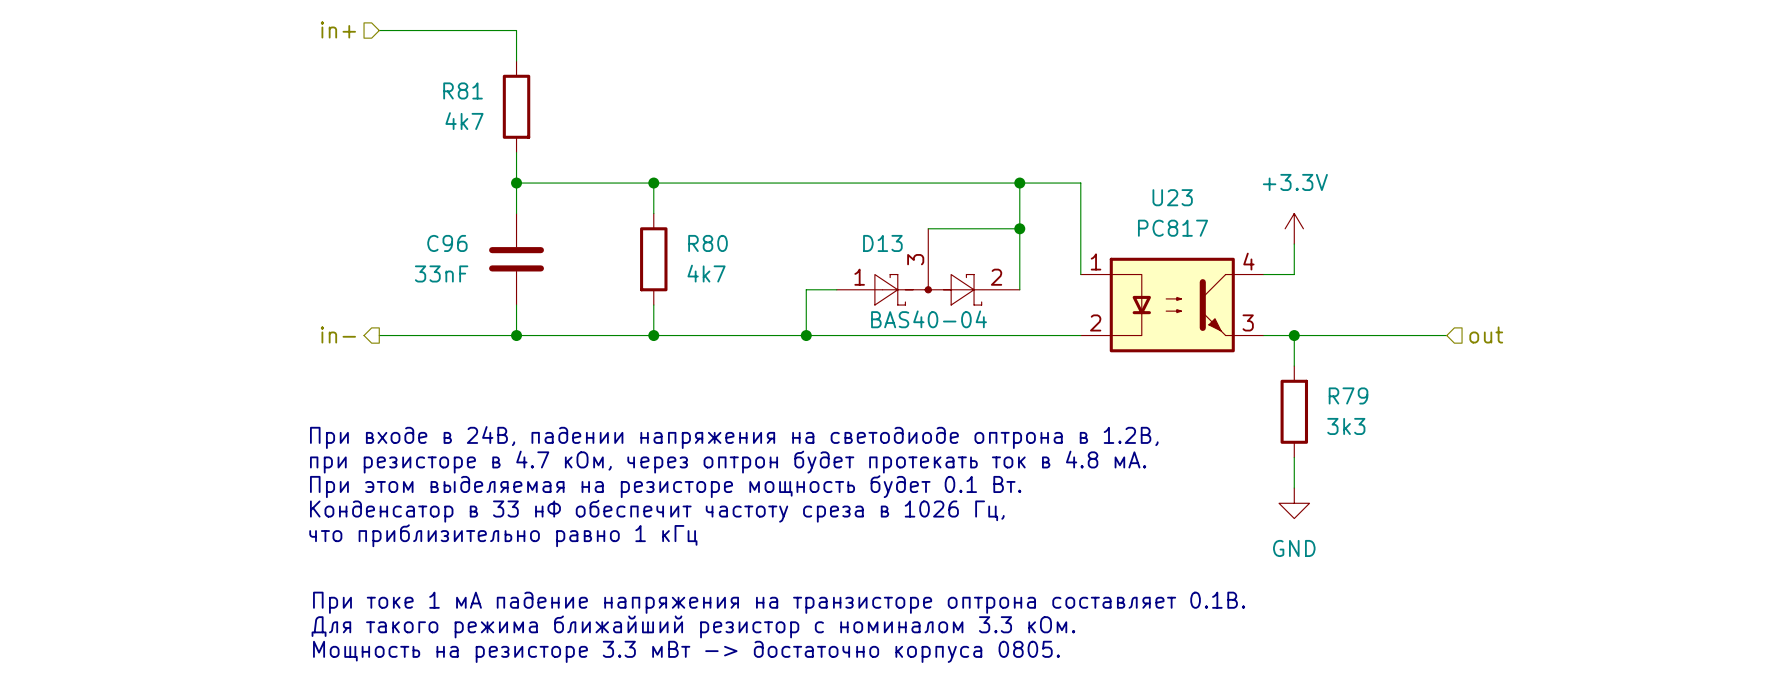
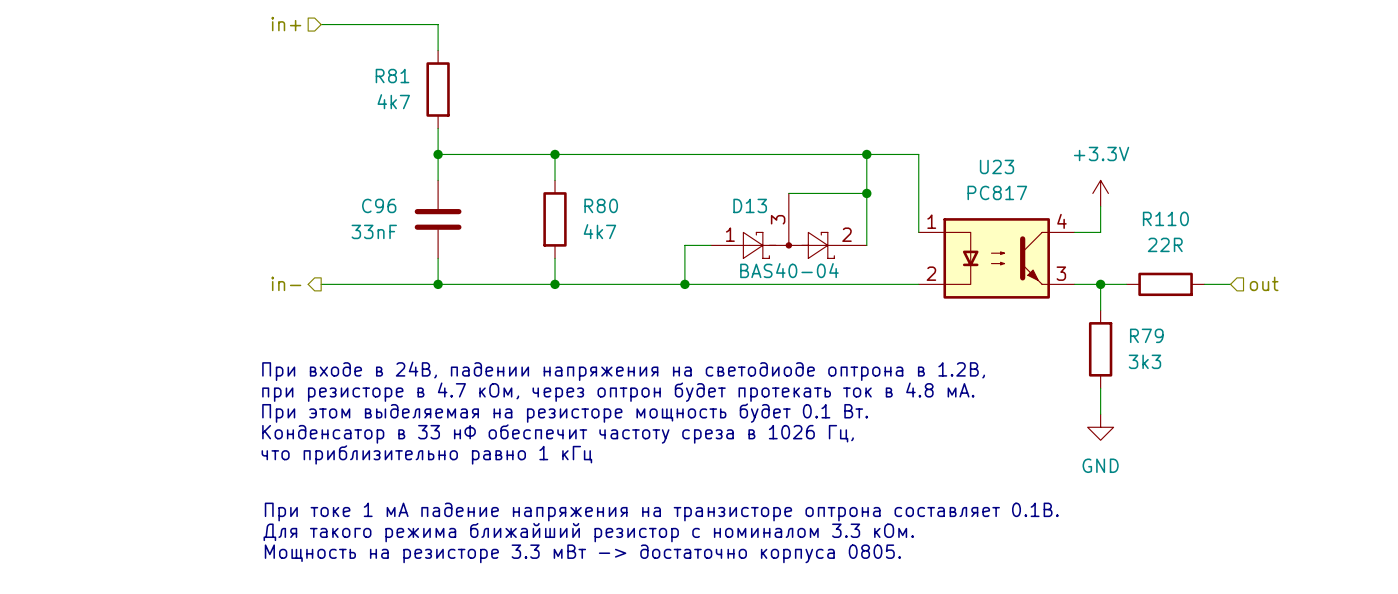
wire: (1324, 335) (1416, 335) -> none
R110: none -> 22R (1165, 284)

